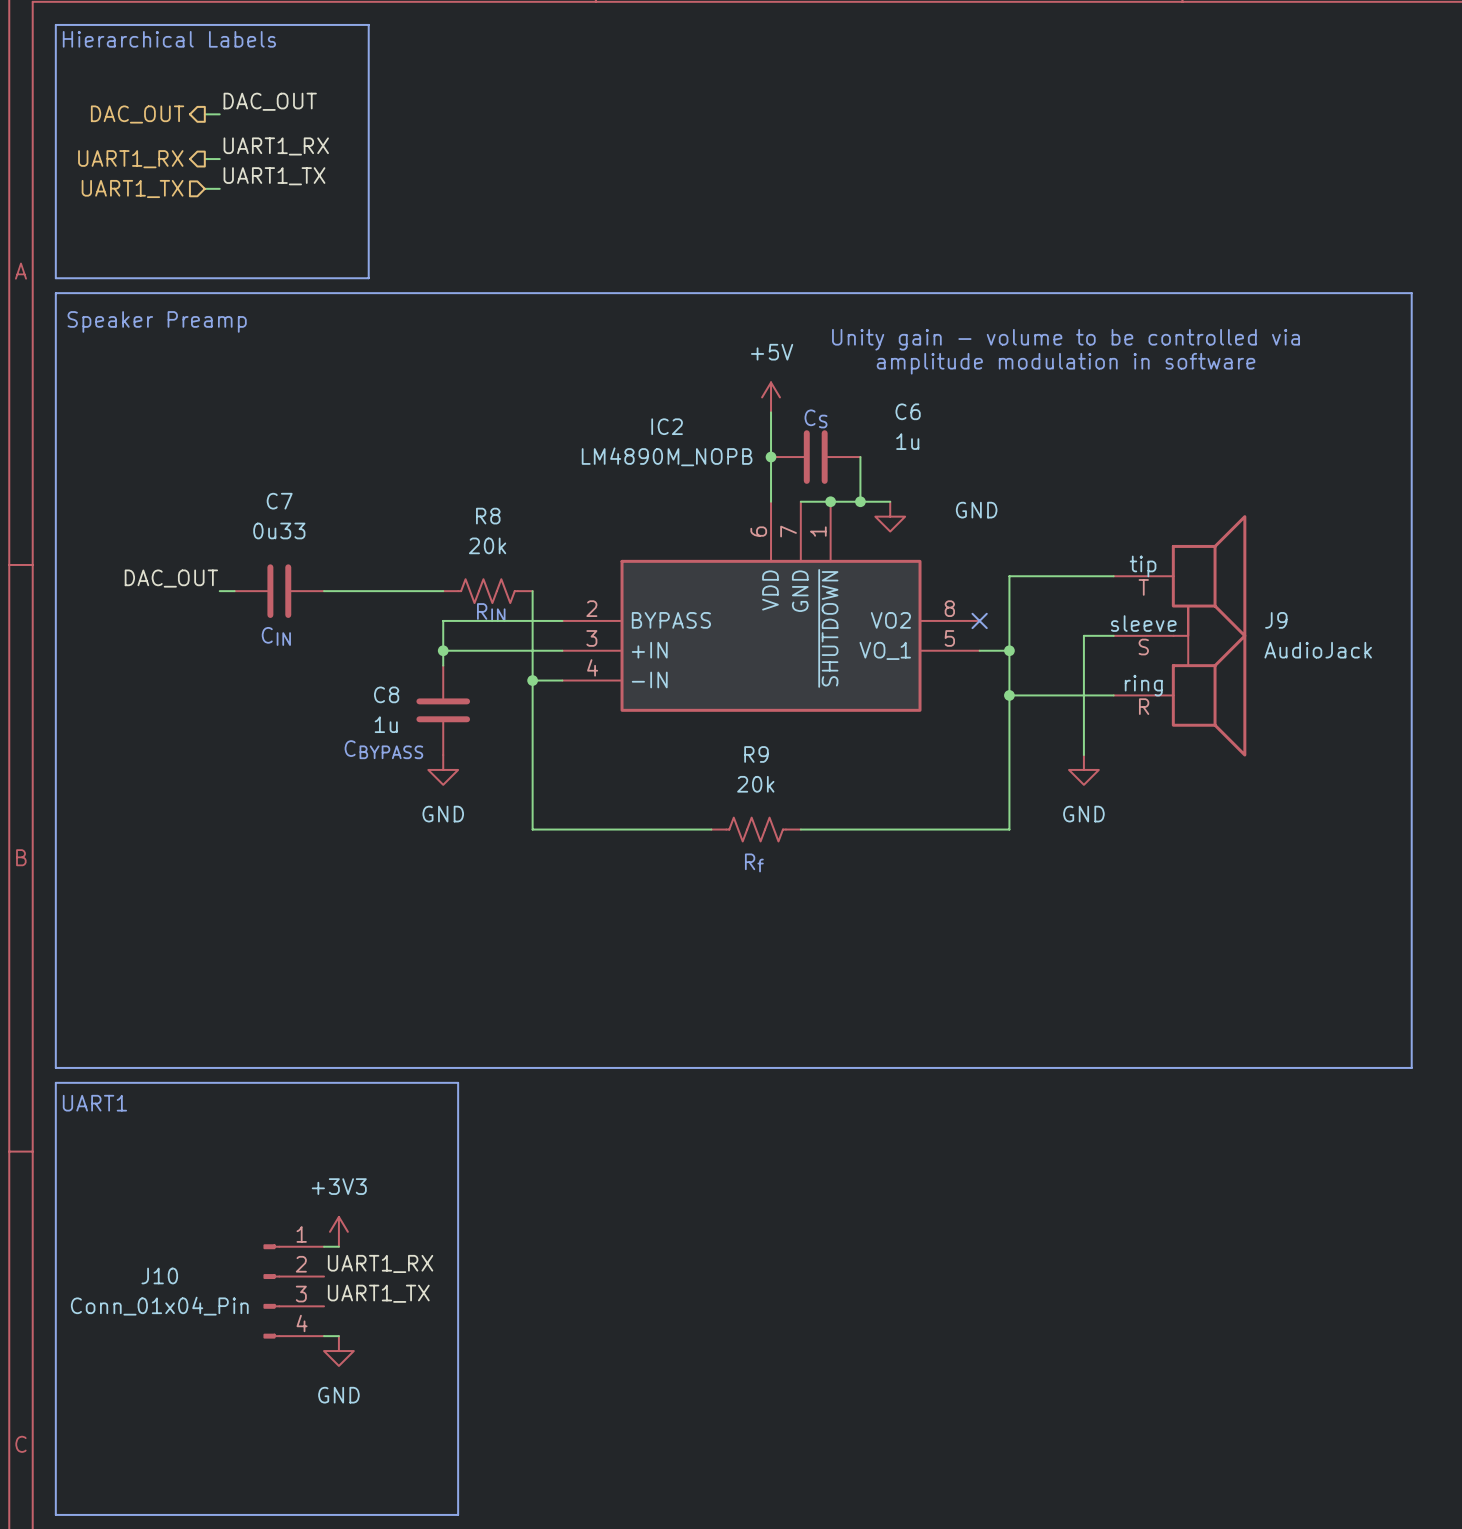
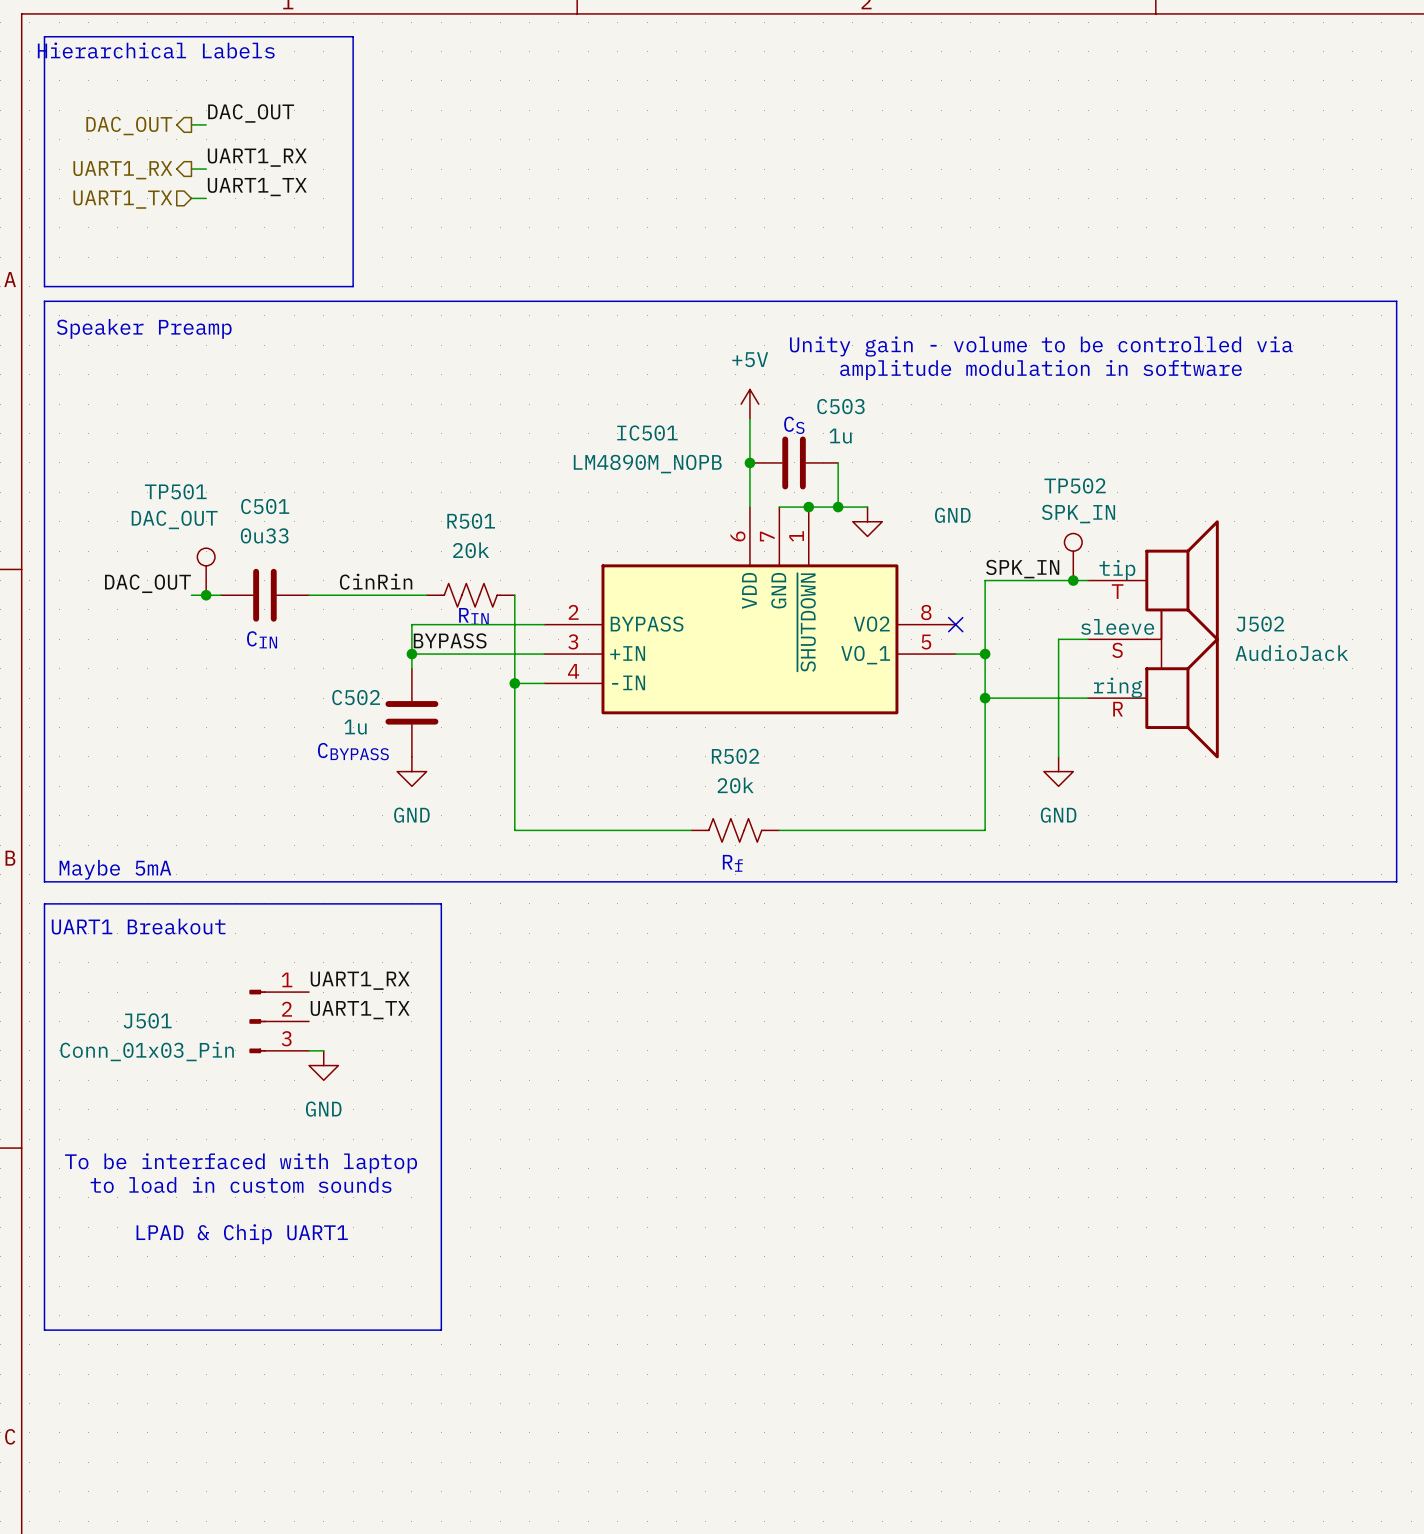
line: (1411, 293) (1411, 1067) (55, 1067) -> (1381, 301) (1396, 301) (1396, 881) (44, 881)
C6 name: C6 (908, 411) -> C503 (840, 406)
IC2 name: IC2 (667, 426) -> IC501 (647, 433)
C6 value position: 1u (907, 441) -> 1u (840, 436)
C7 name: C7 (279, 501) -> C501 (265, 506)
R8 name: R8 (488, 516) -> R501 (471, 521)
TP502: none -> SPK_IN (1073, 557)
label: none -> SPK_IN (1022, 569)
TP501: none -> DAC_OUT (206, 571)
junction: none -> (1073, 580)
label: none -> CinRin (376, 581)
label position: DAC_OUT (171, 578) -> DAC_OUT (147, 583)
wire: none -> (191, 595) (206, 595)
junction: none -> (206, 595)
wire: (443, 620) (443, 665) -> (426, 624) (411, 624) (411, 668)
J9 name: J9 (1276, 620) -> J502 (1260, 624)
label: none -> BYPASS (450, 640)
wire: none -> (411, 654) (426, 654)
junction position: (443, 650) -> (411, 654)
C502: none -> 1u (411, 712)
C8: 1u (443, 710) -> none
text position: CBYPASS (383, 749) -> CBYPASS (353, 751)
R9 name: R9 (756, 754) -> R502 (735, 756)
power symbol position: GND (443, 769) -> GND (411, 771)
text: none -> Maybe 5mA (115, 869)
line: (55, 881) (55, 904) -> none
text: none -> UART1 Breakout (138, 926)
J501: none -> Conn_01x03_Pin (279, 1021)
line: none -> (44, 1065) (44, 1080)
power symbol: none -> GND (323, 1065)
line: (55, 1082) (458, 1082) -> (44, 903) (441, 903) (441, 1080)
text: UART1 (94, 1103) -> none
text: none -> To be interfaced with laptop (241, 1163)
text: none -> to load in custom sounds (241, 1184)
power symbol: +3V3 (338, 1231) -> none
text: none -> LPAD & Chip UART1 (242, 1234)
wire: (324, 1246) (338, 1246) -> (309, 1050) (323, 1050)
label position: UART1_RX (380, 1263) -> UART1_RX (360, 980)
J10: Conn_01x04_Pin (293, 1291) -> none
label position: UART1_TX (378, 1293) -> UART1_TX (360, 1010)
line: (55, 1336) (55, 1514) (458, 1514) (458, 1336) -> (44, 1330) (441, 1330)
power symbol: GND (338, 1351) -> none

